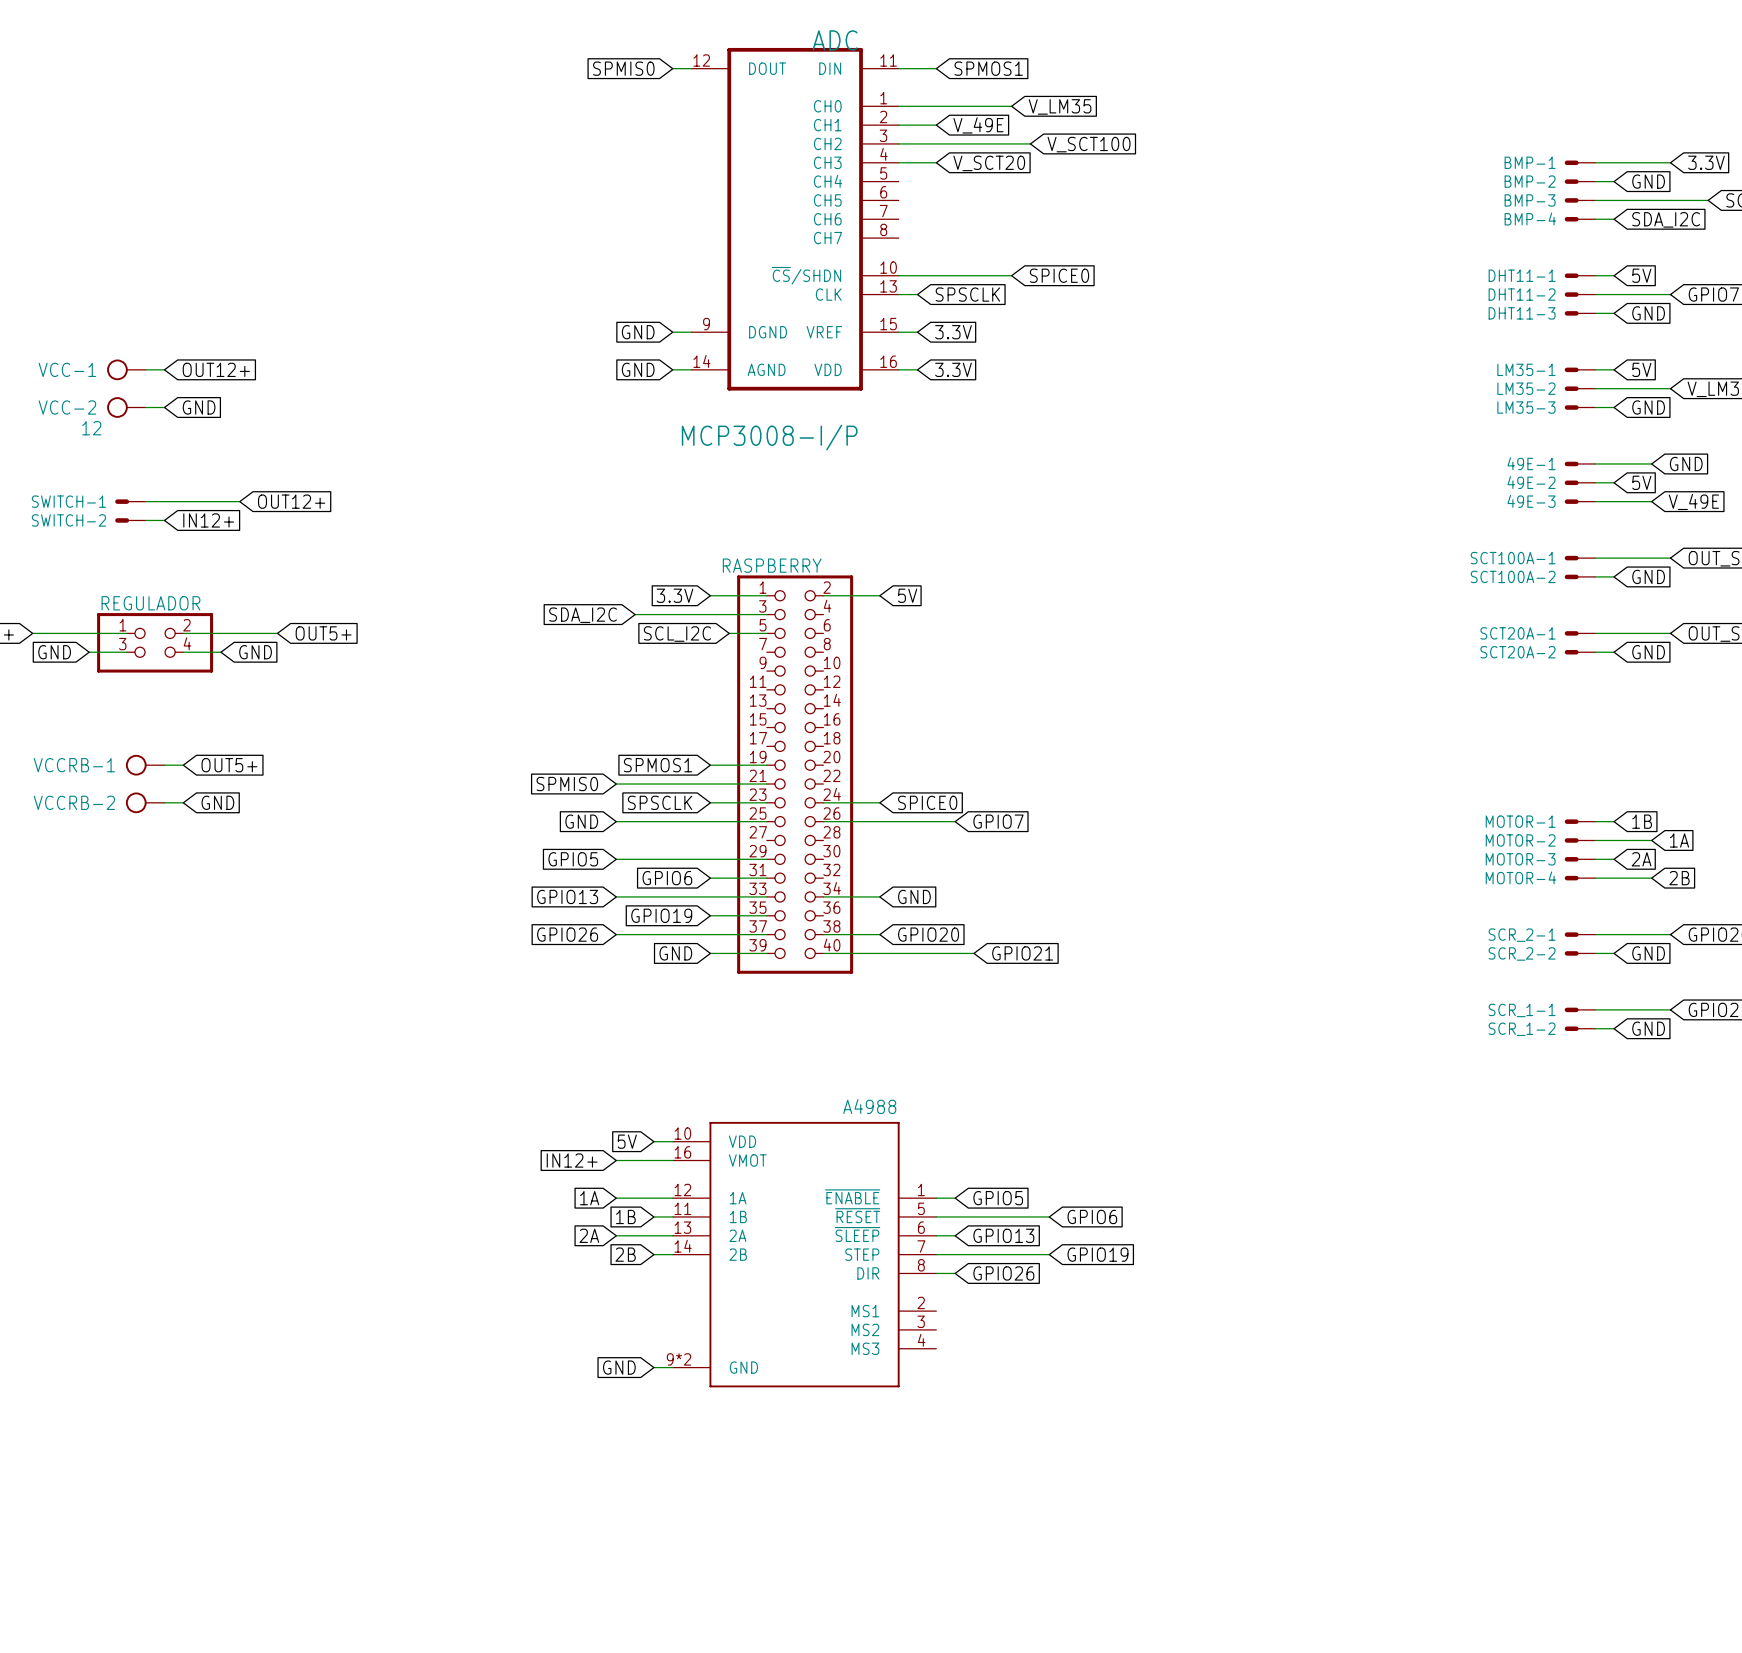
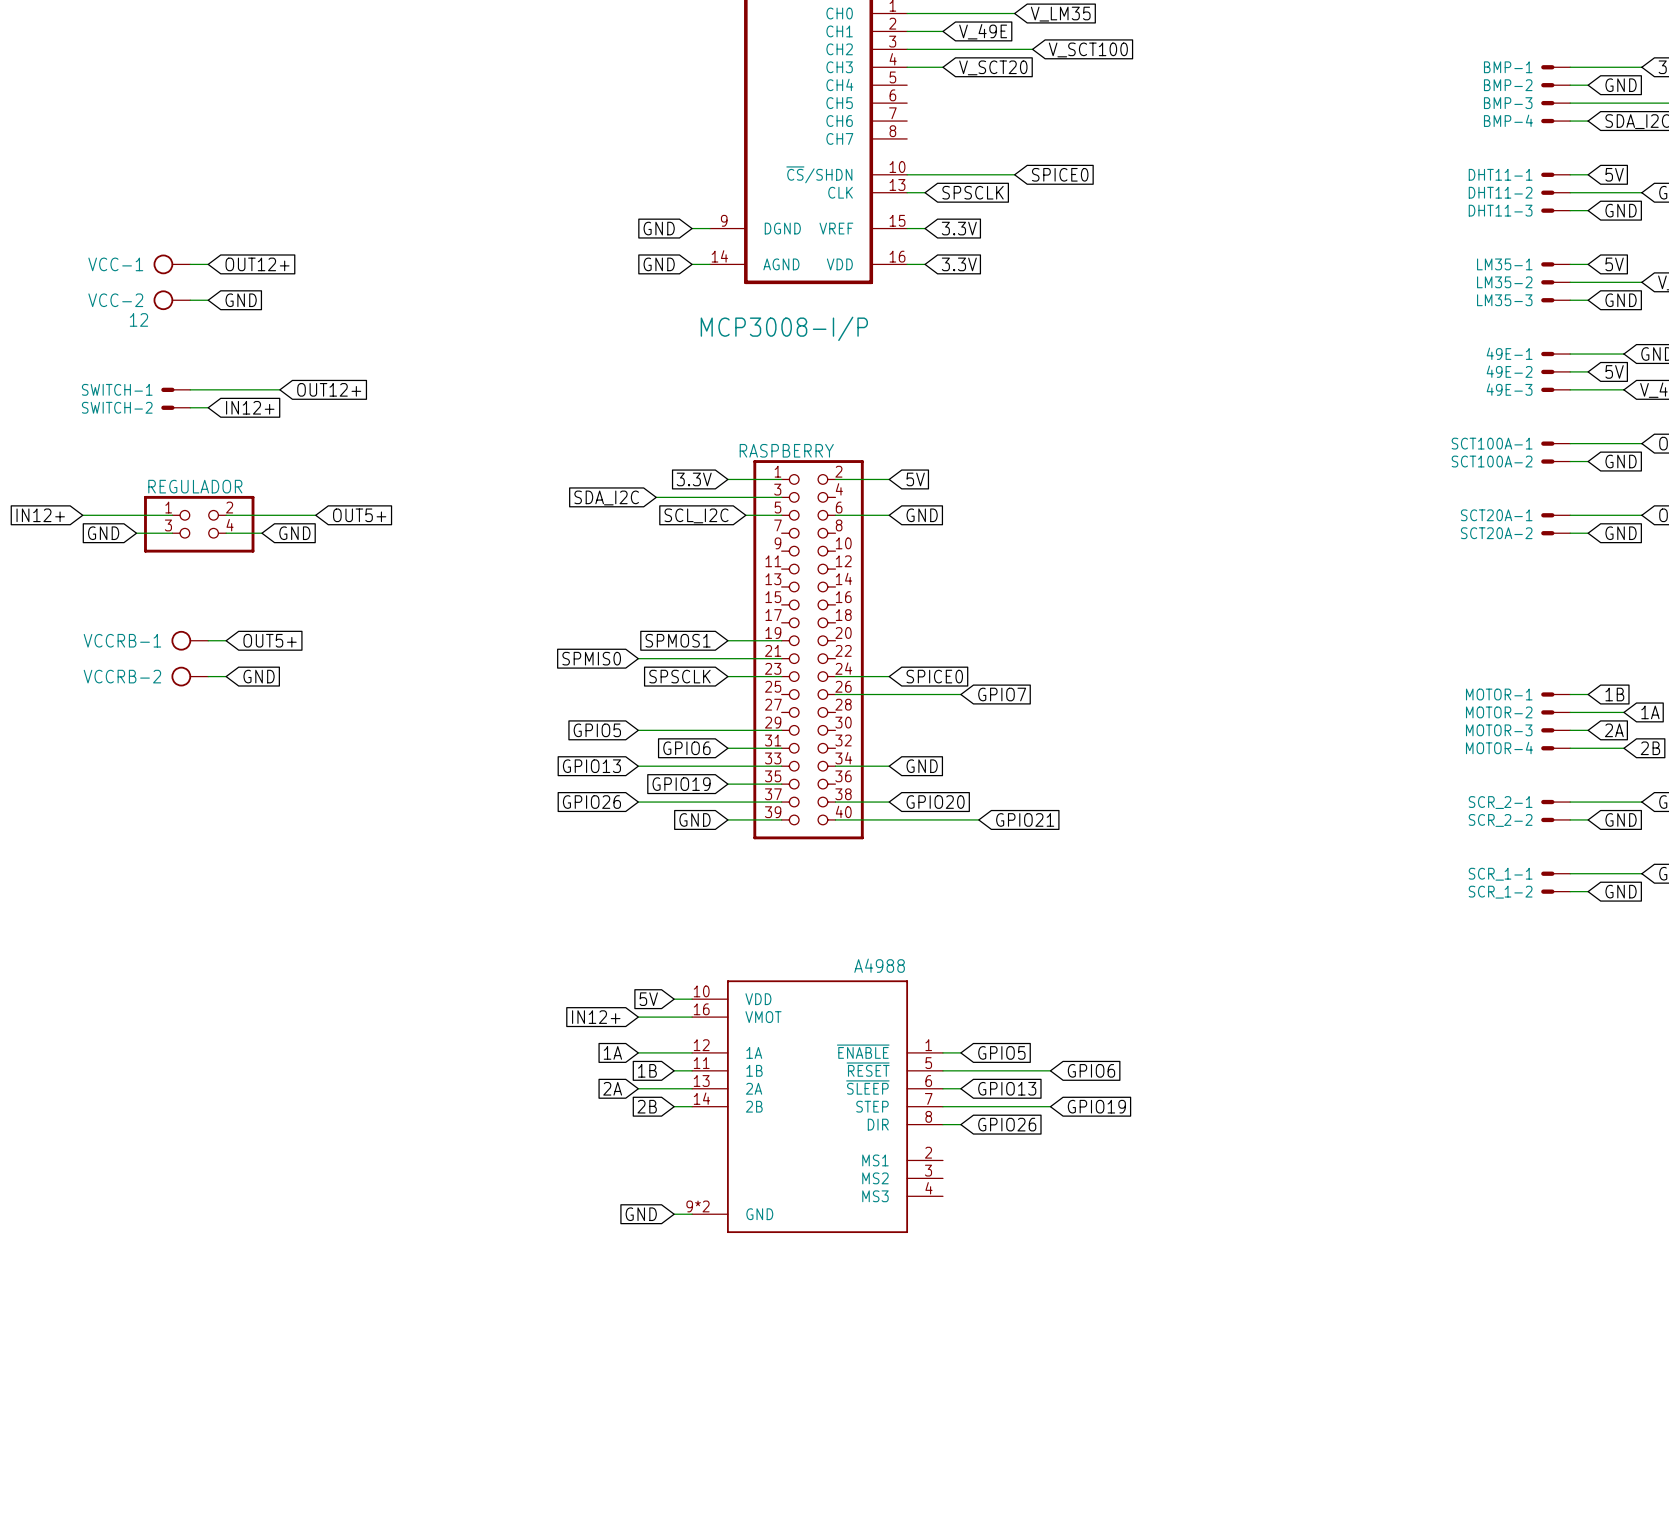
wire: none -> (835, 515) (889, 515)
global label: none -> GND (922, 515)
global label: GND (581, 821) -> none
wire: (616, 821) (766, 821) -> none

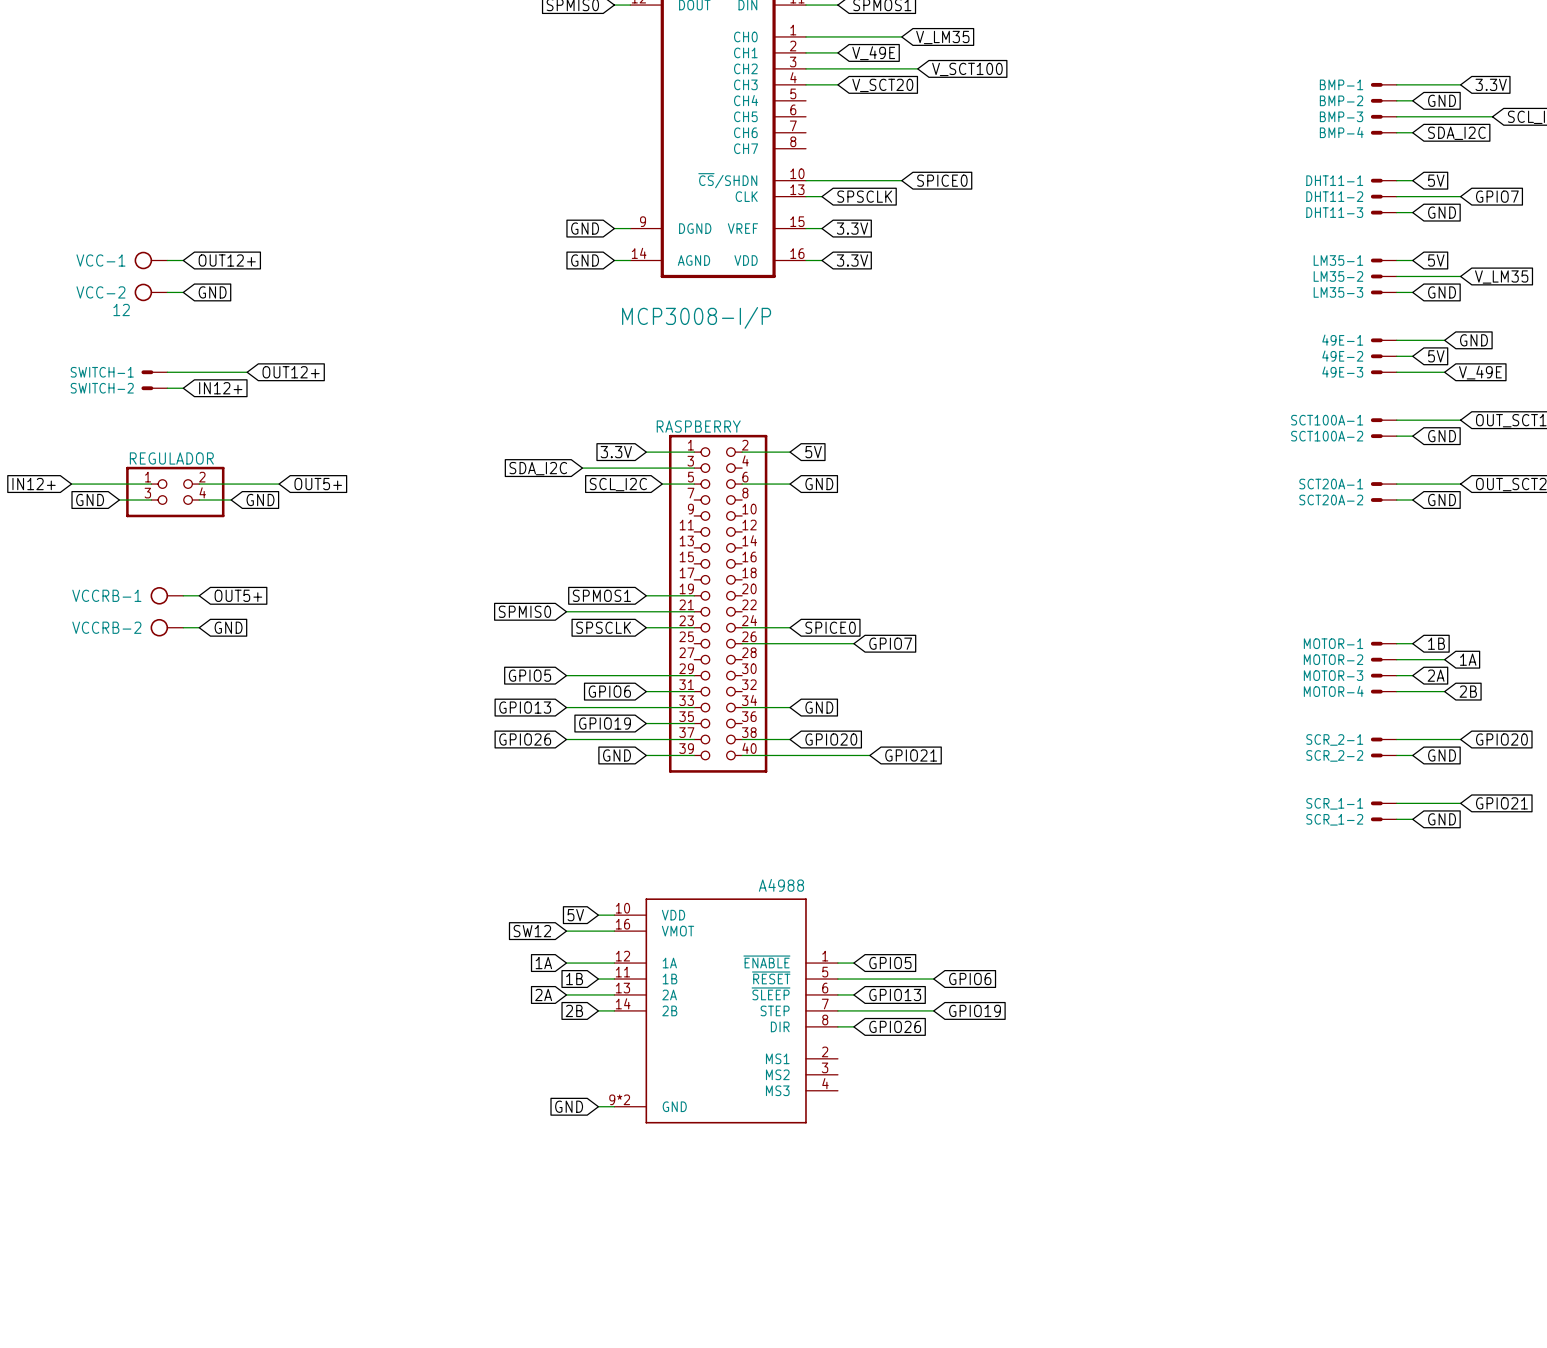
global label: IN12+ (596, 1017) -> SW12 (532, 931)

